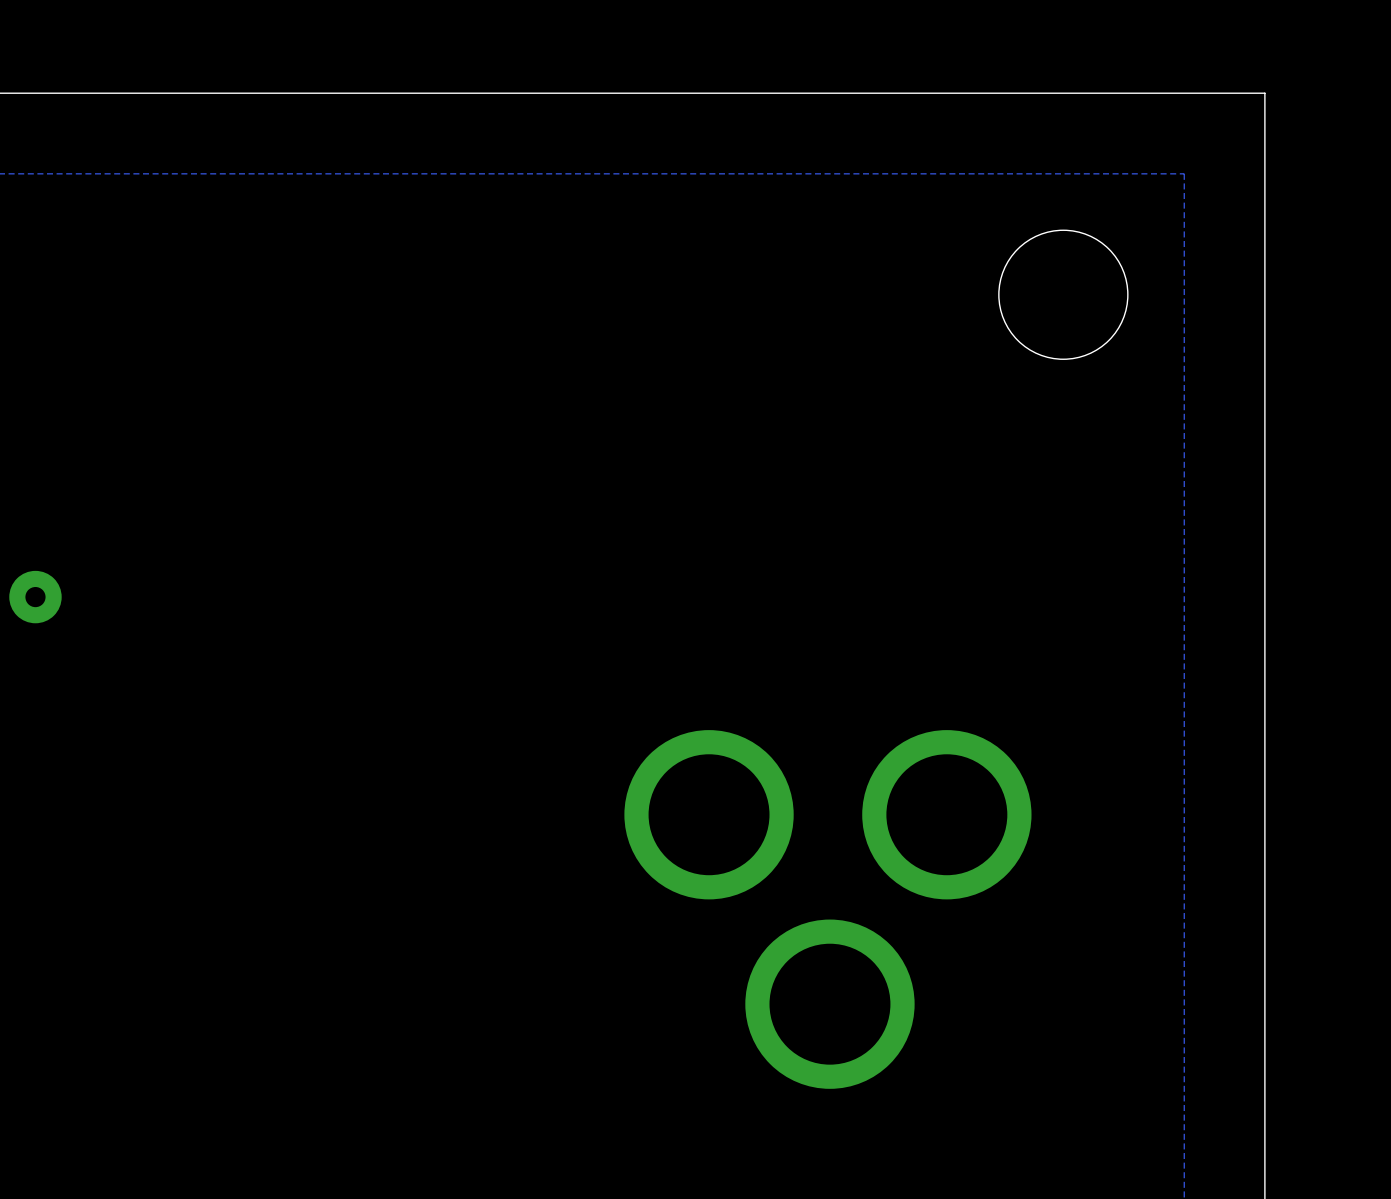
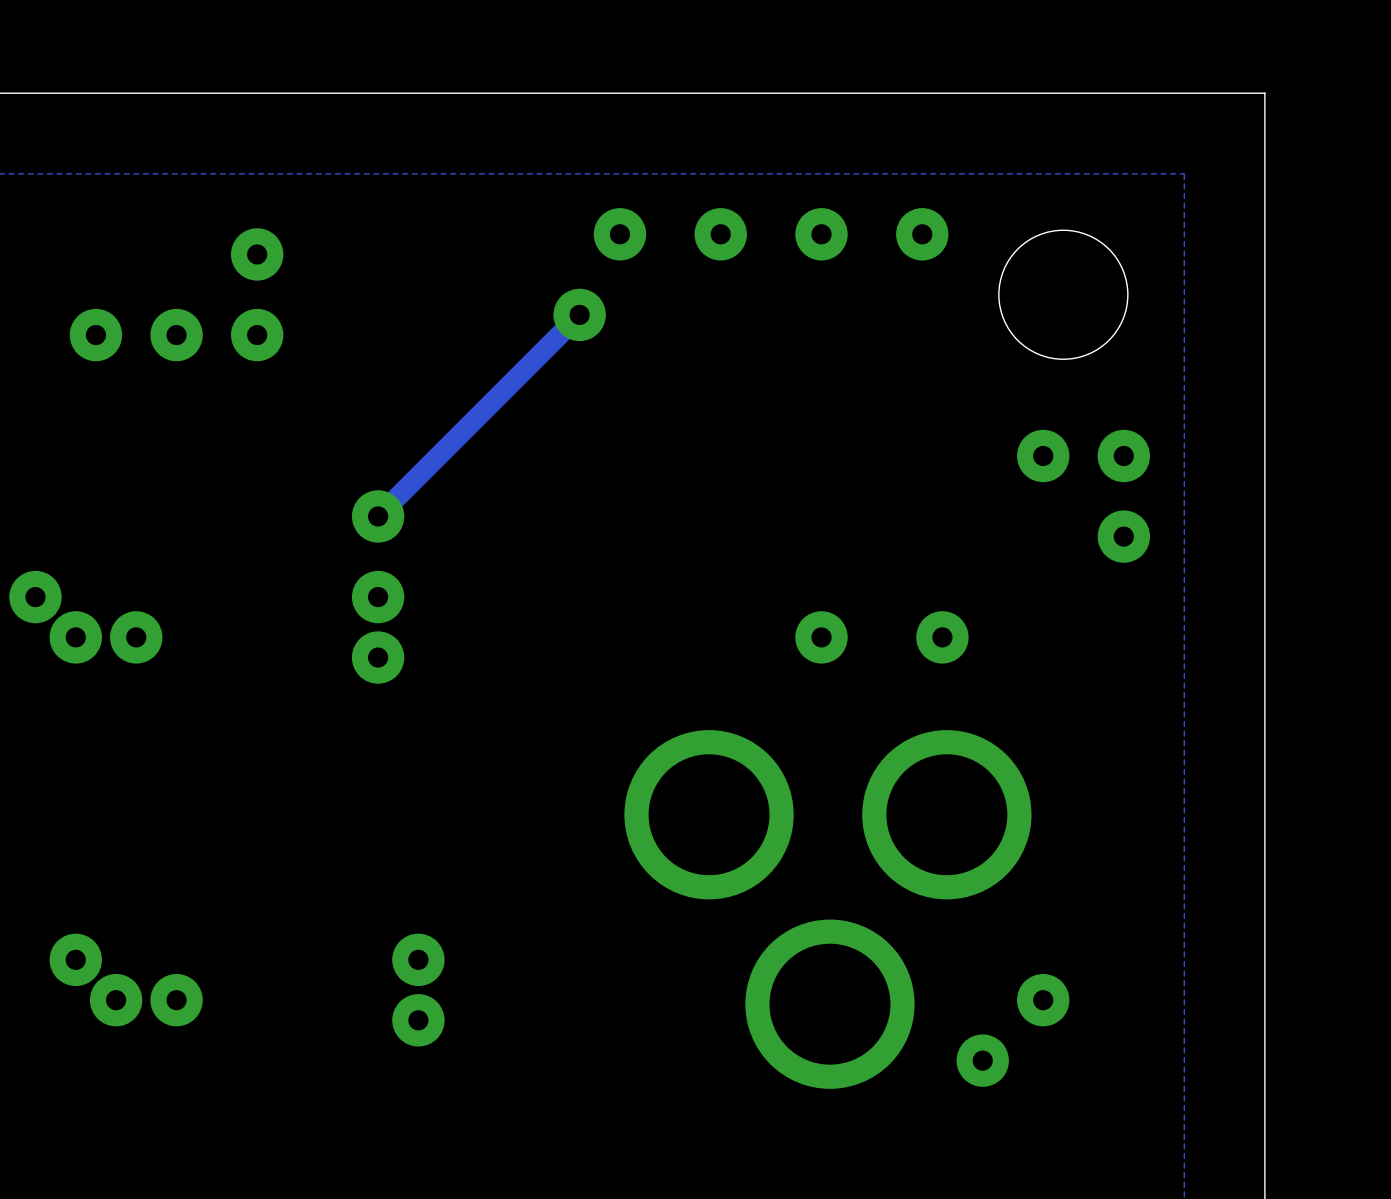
via: none -> (619, 234)
via: none -> (720, 234)
via: none -> (821, 234)
via: none -> (922, 234)
via: none -> (257, 254)
track: none -> (579, 314) (378, 516)
via: none -> (579, 314)
via: none -> (95, 335)
via: none -> (176, 335)
via: none -> (257, 335)
via: none -> (1043, 455)
via: none -> (1123, 455)
via: none -> (378, 516)
via: none -> (1123, 536)
via: none -> (378, 597)
via: none -> (75, 637)
via: none -> (136, 637)
via: none -> (821, 637)
via: none -> (942, 637)
via: none -> (378, 657)
via: none -> (75, 959)
via: none -> (418, 959)
via: none -> (116, 1000)
via: none -> (176, 1000)
via: none -> (1043, 1000)
via: none -> (418, 1020)
via: none -> (982, 1060)

